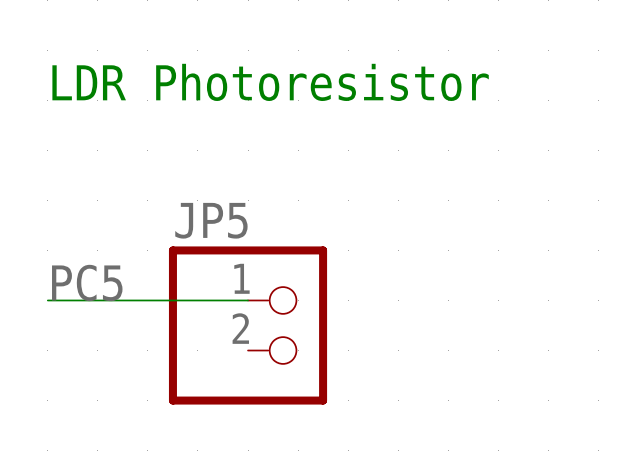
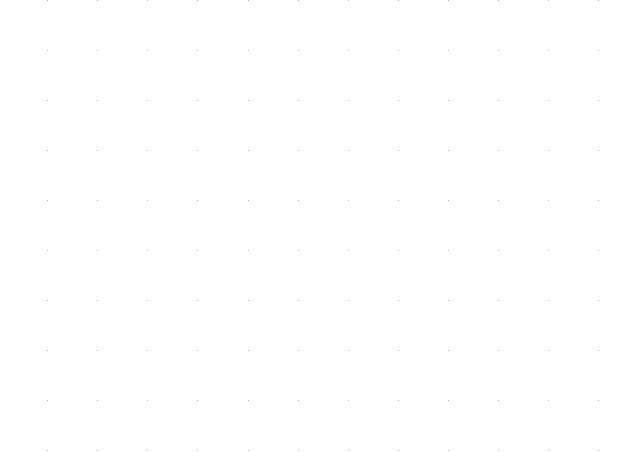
text: LDR Photoresistor (270, 82) -> none
label: PC5 (87, 282) -> none
wire: (47, 300) (248, 300) -> none
JP5: (248, 325) -> none

